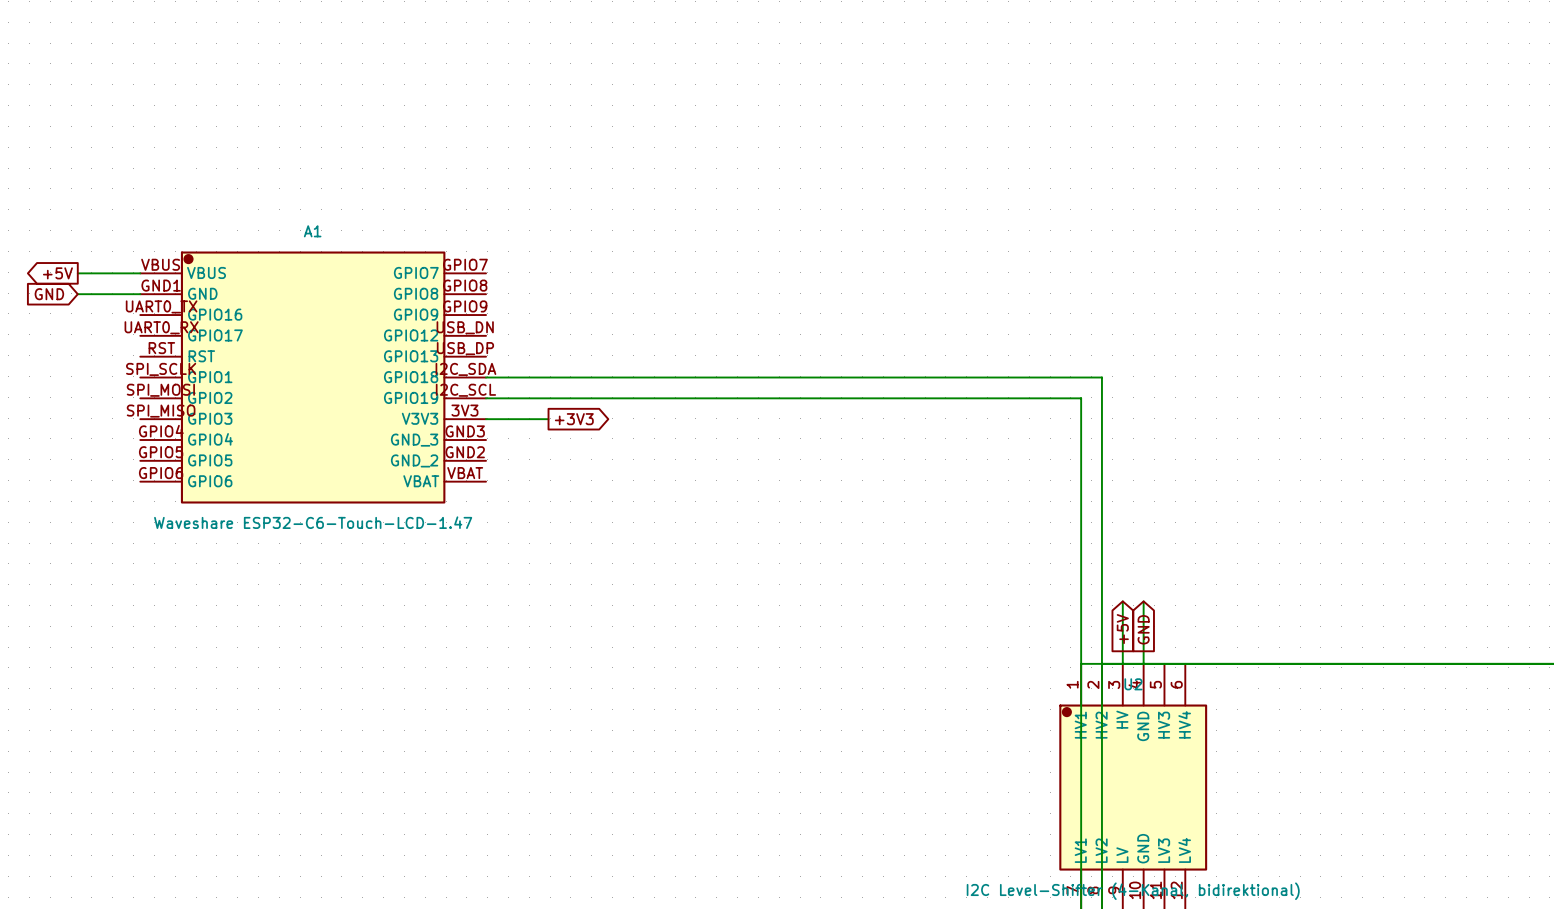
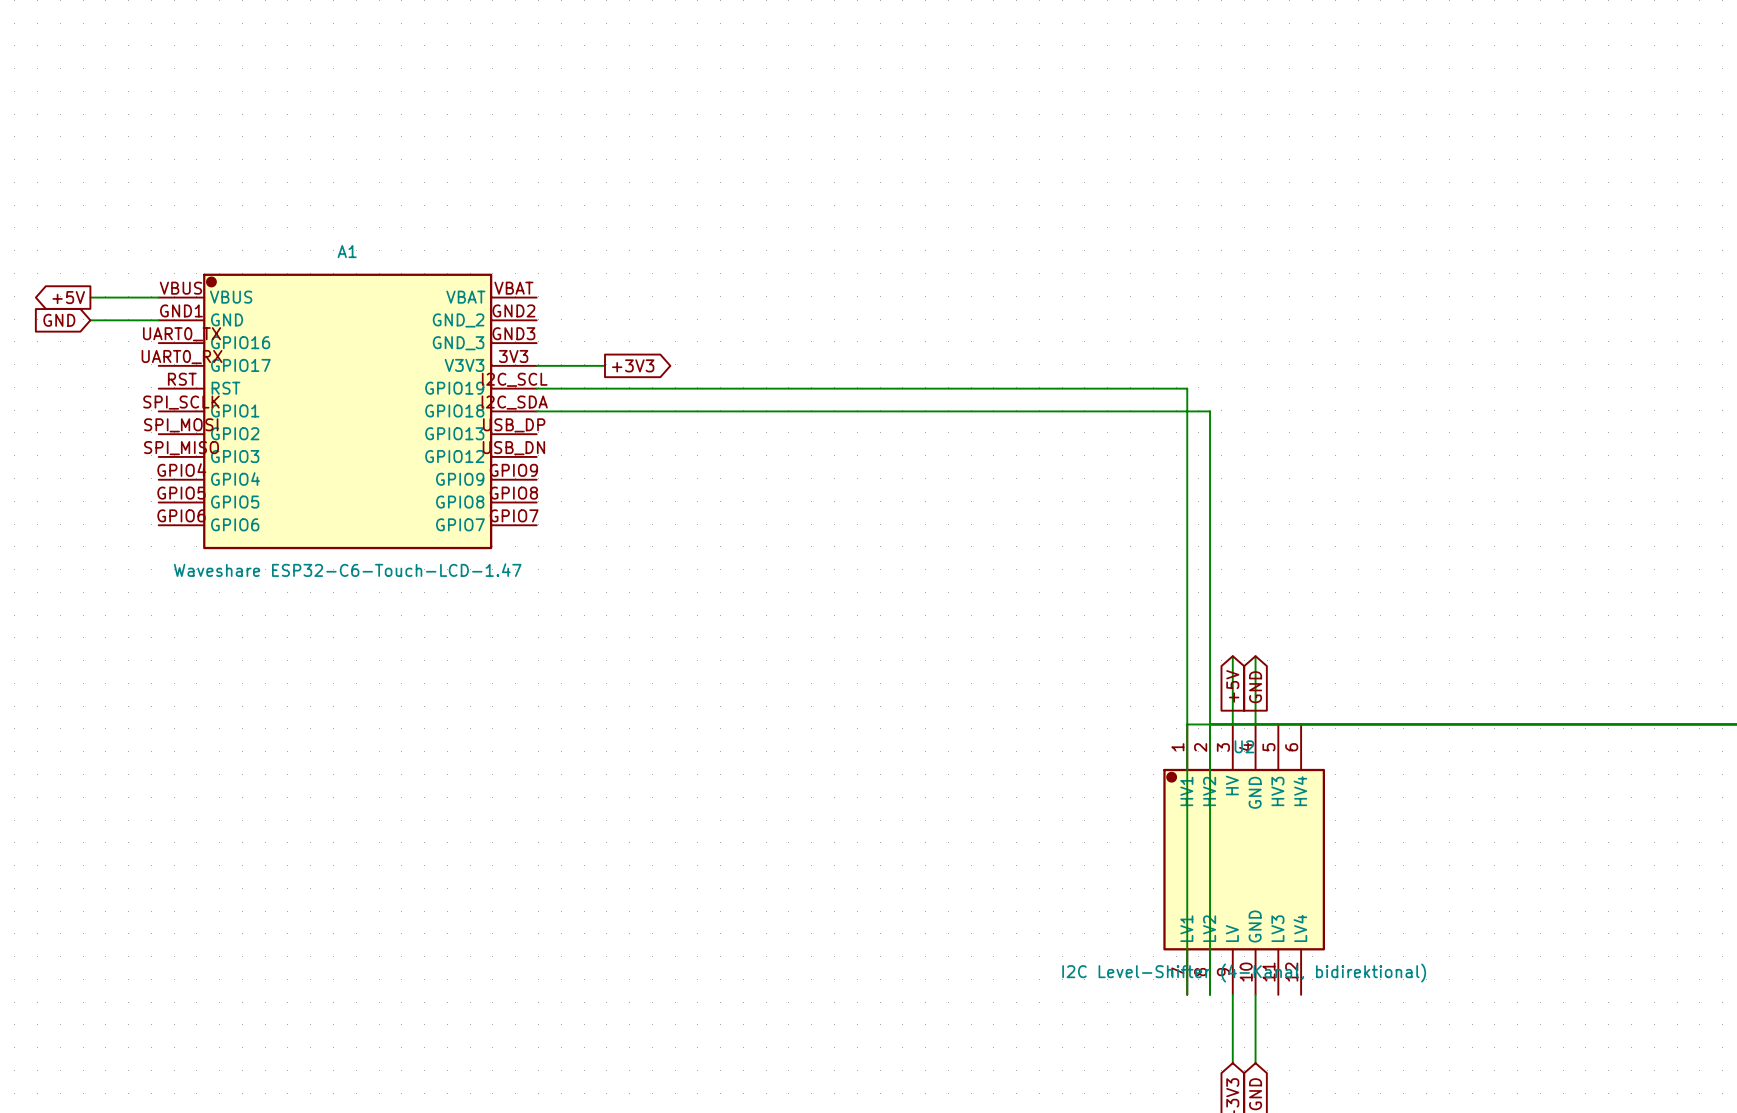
A1 symbol: [140, 251, 487, 504] -> [158, 273, 537, 550]
wire: (486, 398) (1081, 398) -> (536, 388) (1187, 388) (1187, 434)
wire: (486, 419) (548, 419) -> (536, 365) (604, 365)
global label position: +3V3 (574, 419) -> +3V3 (633, 365)

